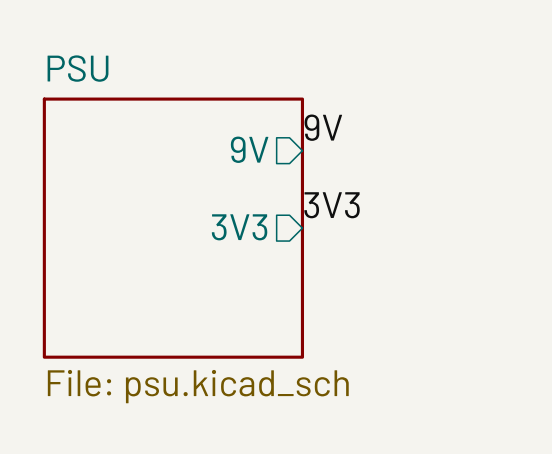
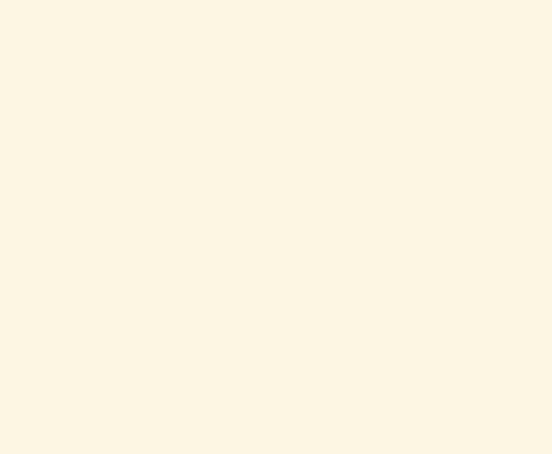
label: 9V (323, 127) -> none
sheet pin: 9V (249, 149) -> none
label: 3V3 (332, 205) -> none
sheet pin: 3V3 (239, 227) -> none
sheet PSU: File: psu.kicad_sch (173, 228) -> none

